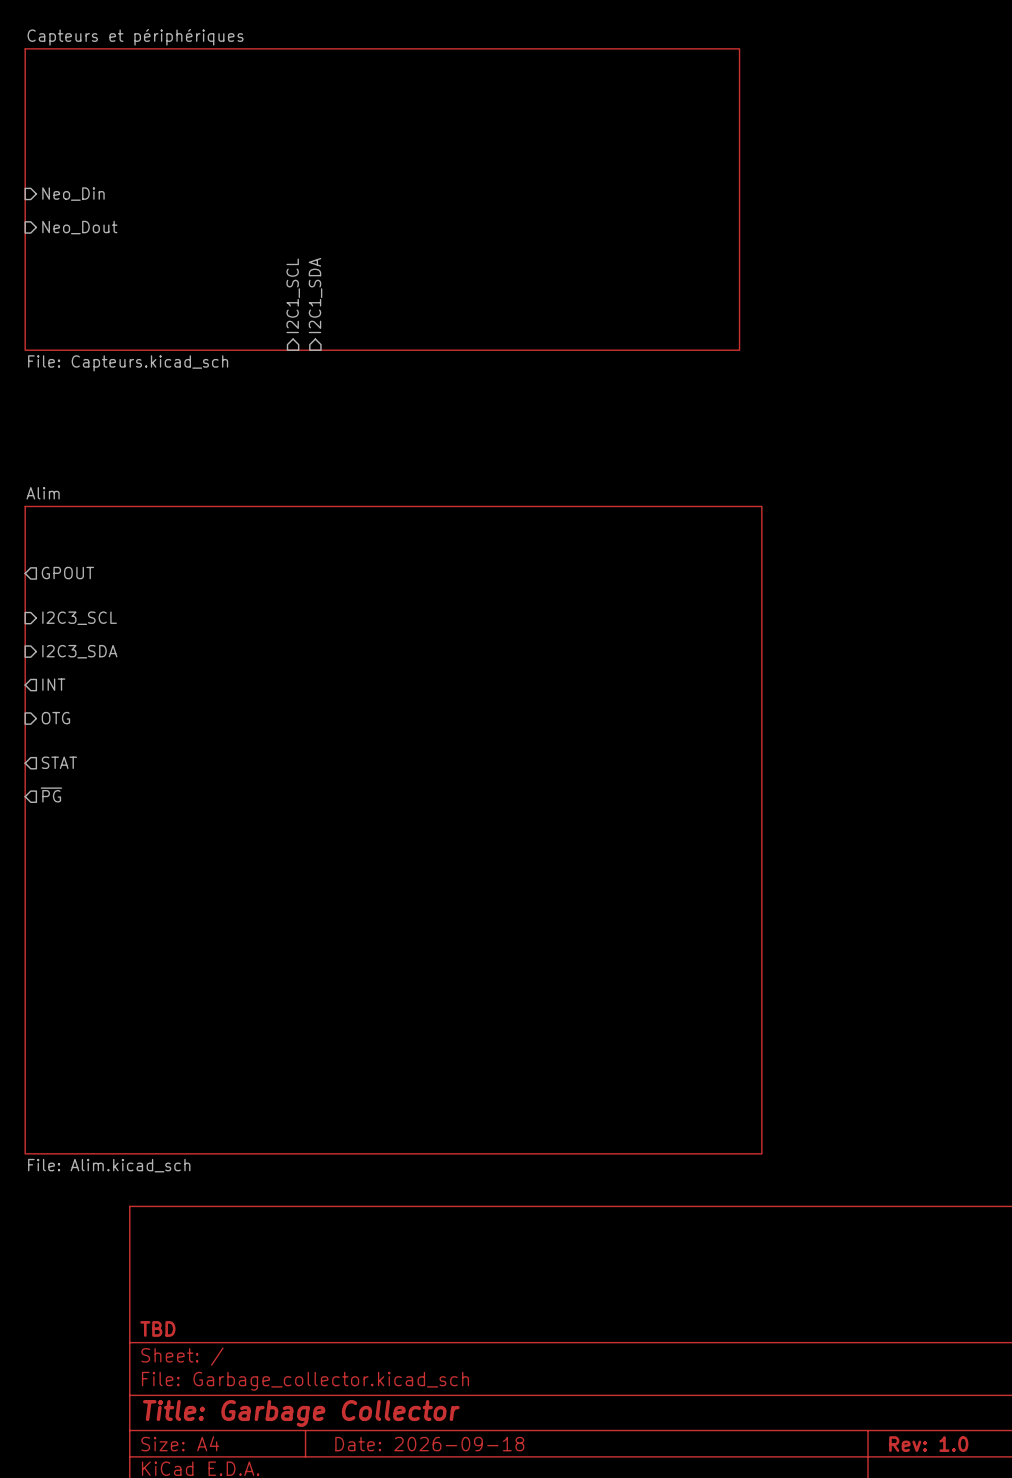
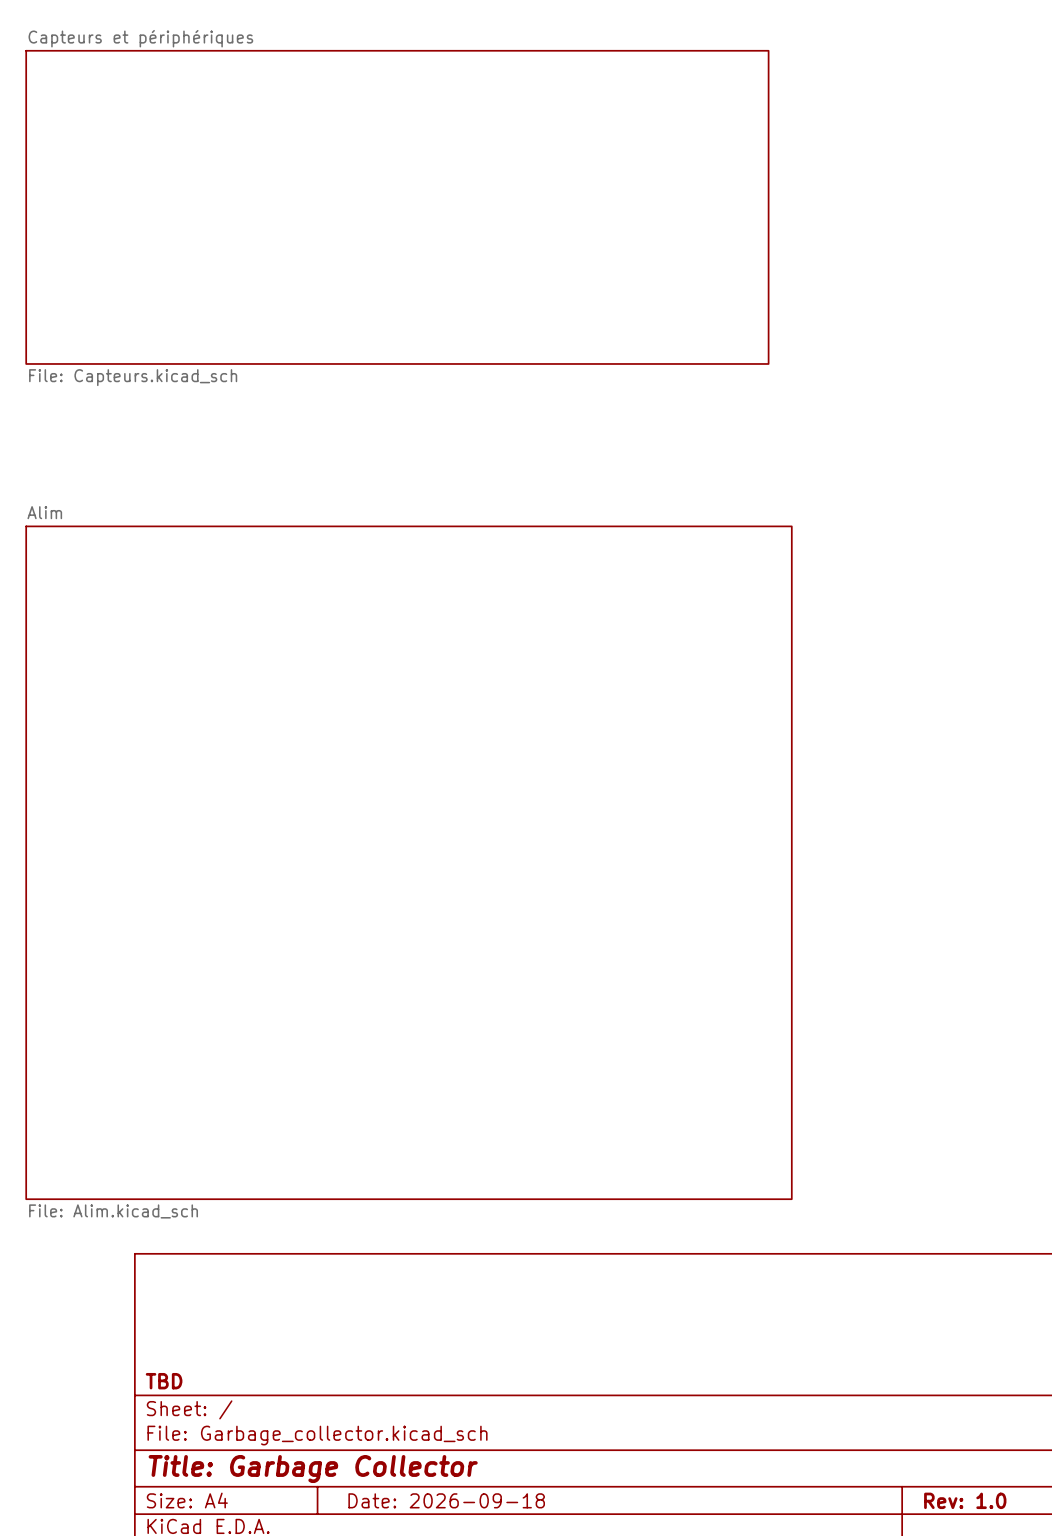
sheet pin: Neo_Din (73, 194) -> none
sheet pin: Neo_Dout (79, 227) -> none
sheet pin: I2C1_SCL (293, 295) -> none
sheet pin: I2C1_SDA (315, 295) -> none
sheet pin: GPOUT (67, 573) -> none
sheet pin: I2C3_SCL (79, 618) -> none
sheet pin: I2C3_SDA (79, 651) -> none
sheet pin: INT (53, 684) -> none
sheet pin: OTG (55, 718) -> none
sheet pin: STAT (59, 762) -> none
sheet pin: ~{PG} (51, 794) -> none

